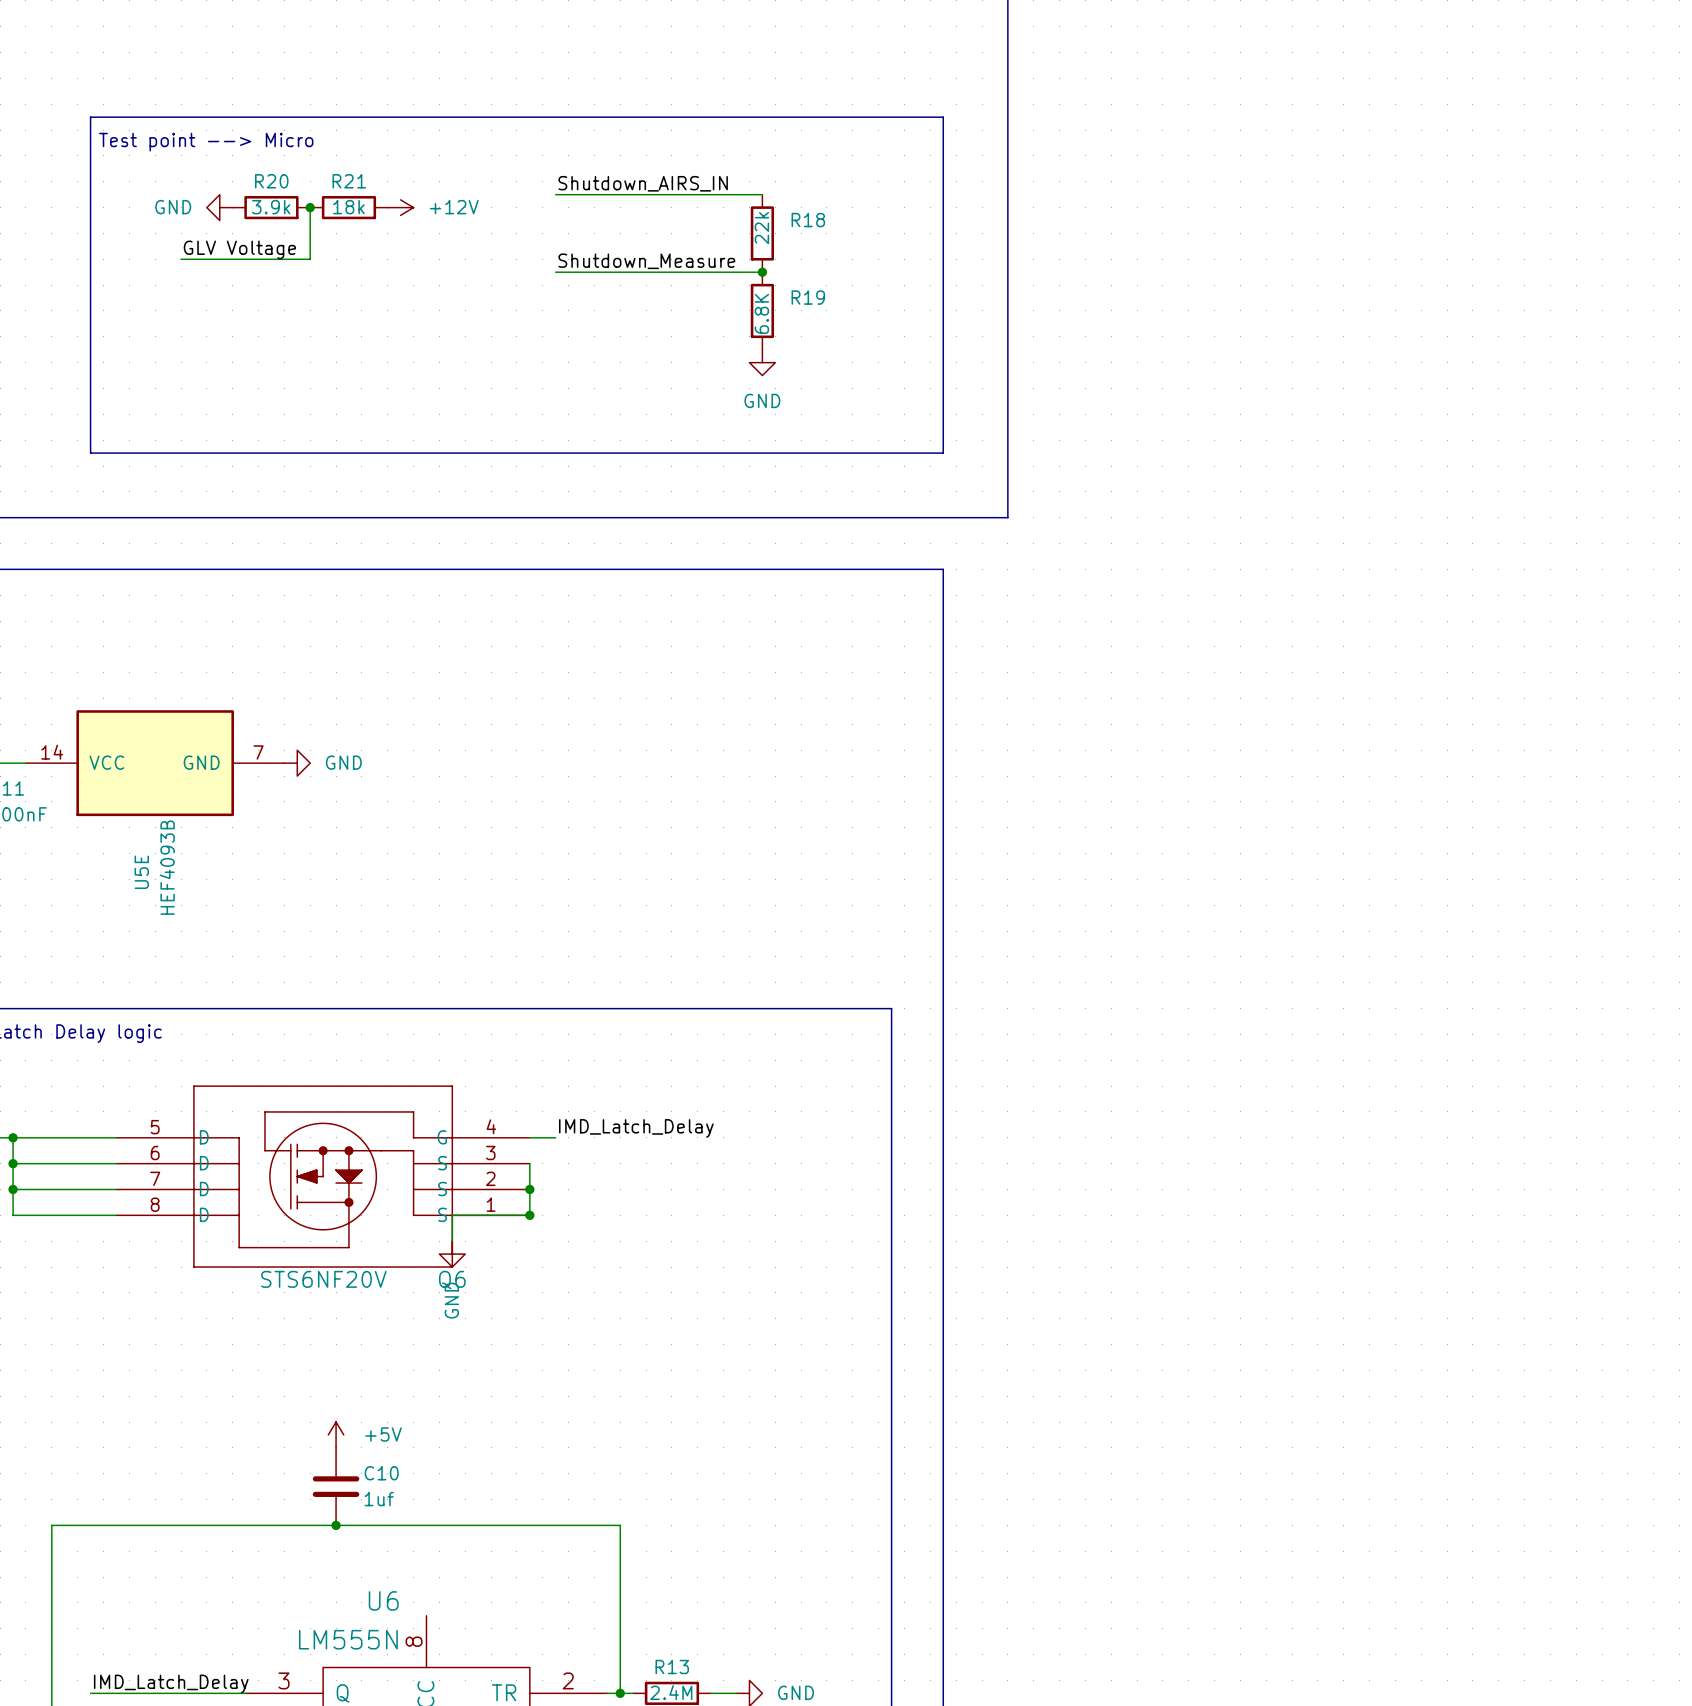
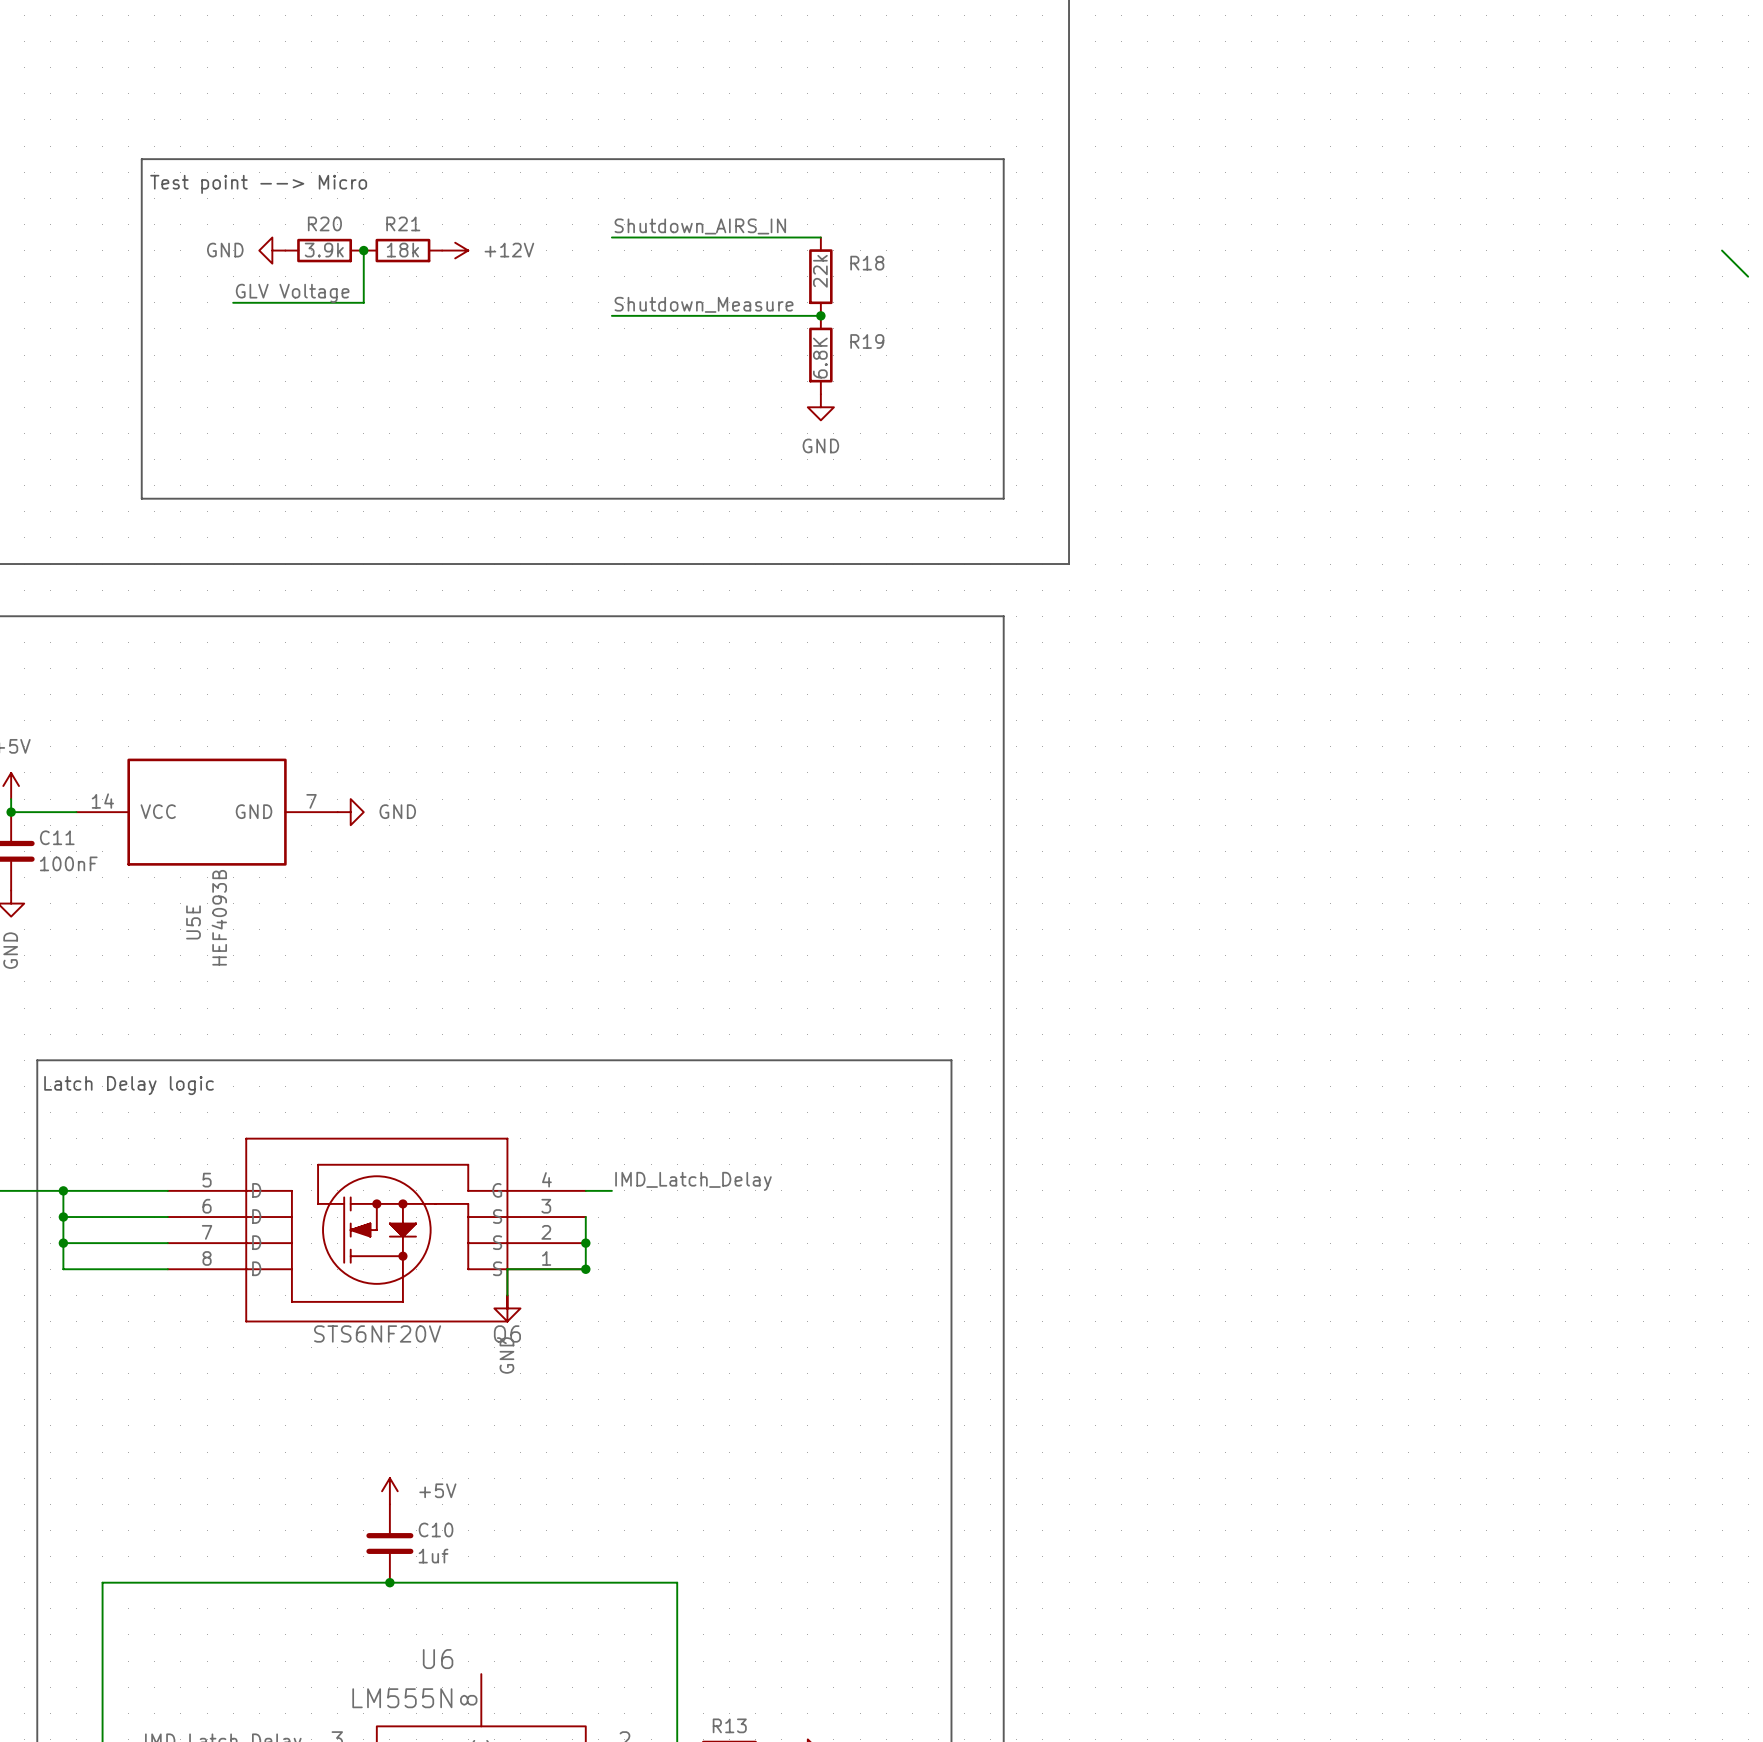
wire: none -> (1722, 250) (1748, 276)

